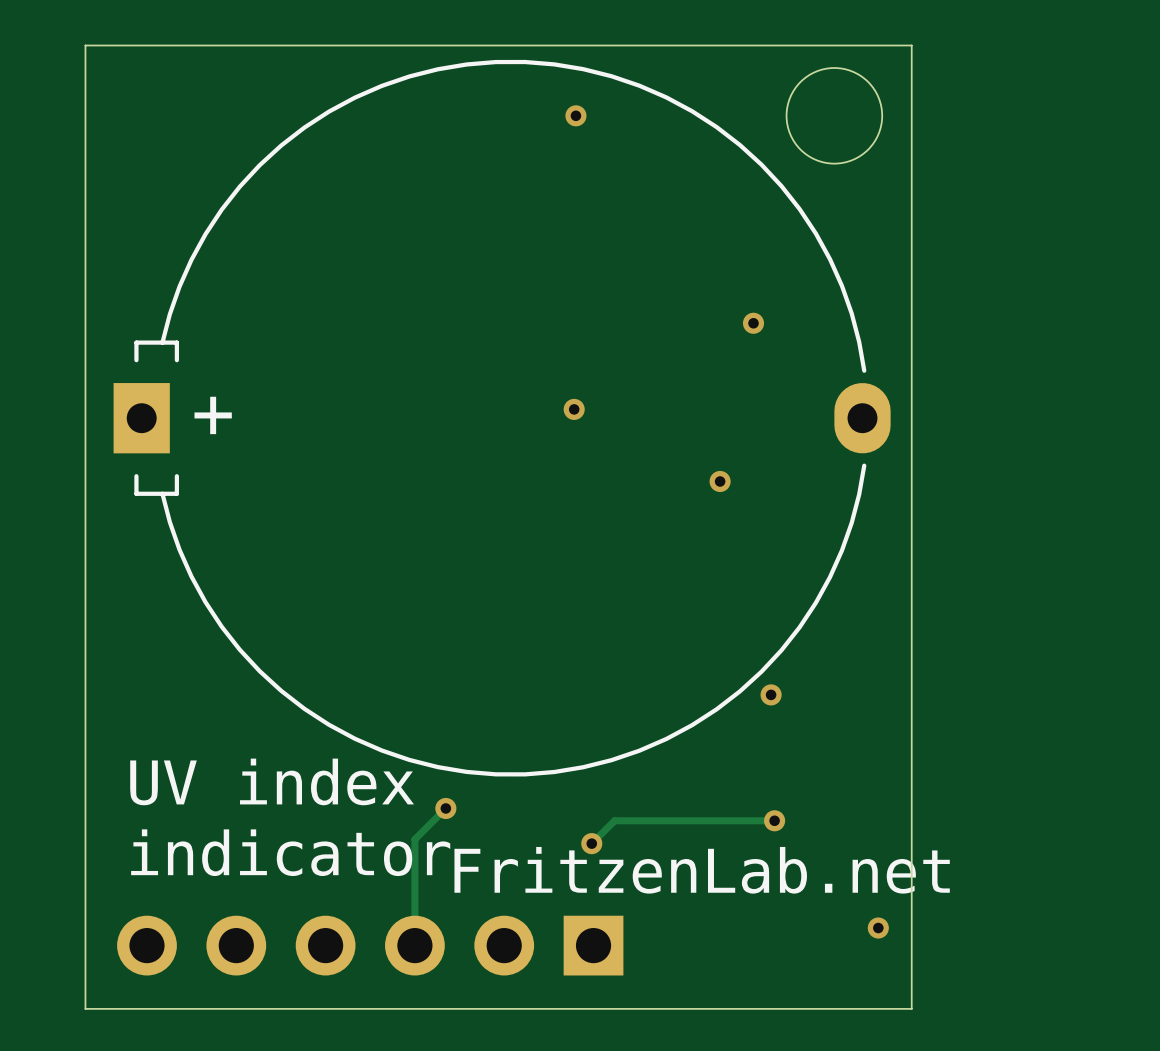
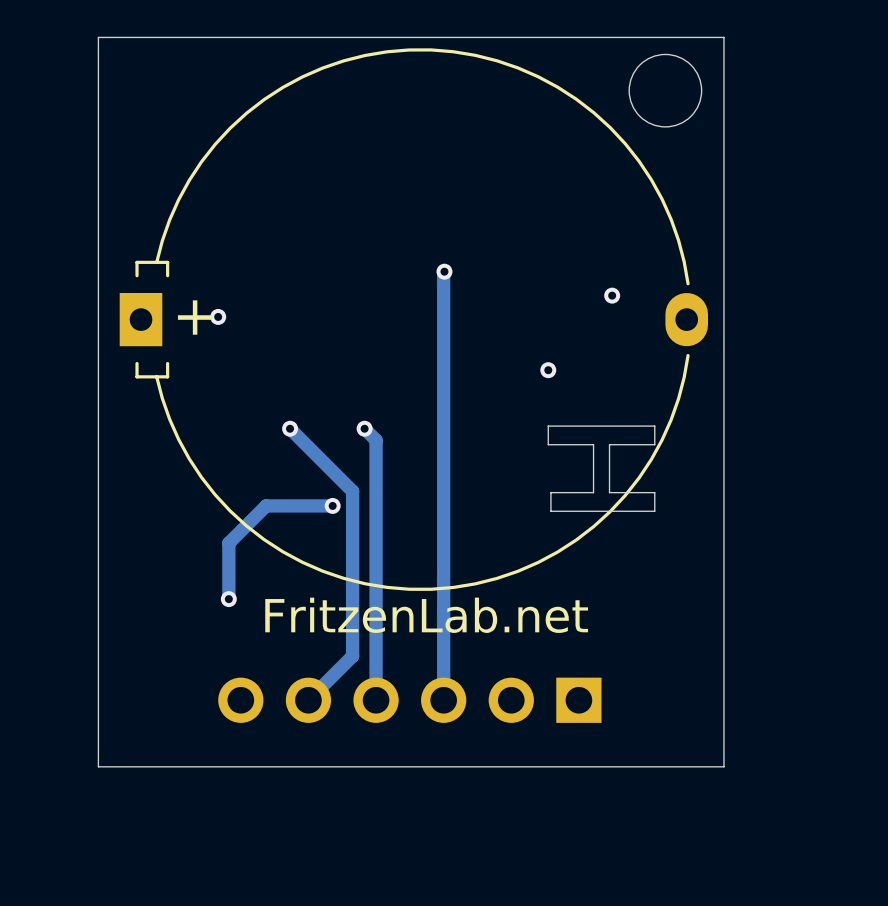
via: (575, 115) -> none
via: (753, 323) -> none
track: none -> (444, 271) (443, 700)
via: none -> (612, 295)
via position: (574, 409) -> (444, 271)
via: none -> (218, 316)
via position: (720, 481) -> (548, 370)
board edge: none -> (654, 426) (654, 444) (609, 444) (609, 492) (654, 492) (654, 511) (550, 511) (550, 492) (593, 492) (593, 444) (548, 444) (548, 426) (654, 426)
track: none -> (290, 428) (352, 491) (352, 656) (308, 700)
via: none -> (290, 428)
track: none -> (364, 428) (376, 440) (376, 700)
via: none -> (364, 428)
track: none -> (332, 505) (266, 505) (228, 543) (228, 599)
via: none -> (332, 505)
via: (771, 694) -> none
text: UV index (272, 781) -> none
via: none -> (228, 599)
track: (445, 808) (414, 839) (414, 945) -> none
via: (445, 808) -> none
track: (774, 820) (614, 820) (591, 843) -> none
via: (774, 820) -> none
via: (591, 843) -> none
text: indicator (290, 852) -> none
text position: FritzenLab.net (702, 870) -> FritzenLab.net (426, 615)
via: (878, 928) -> none
part position: (370, 945) -> (409, 700)

